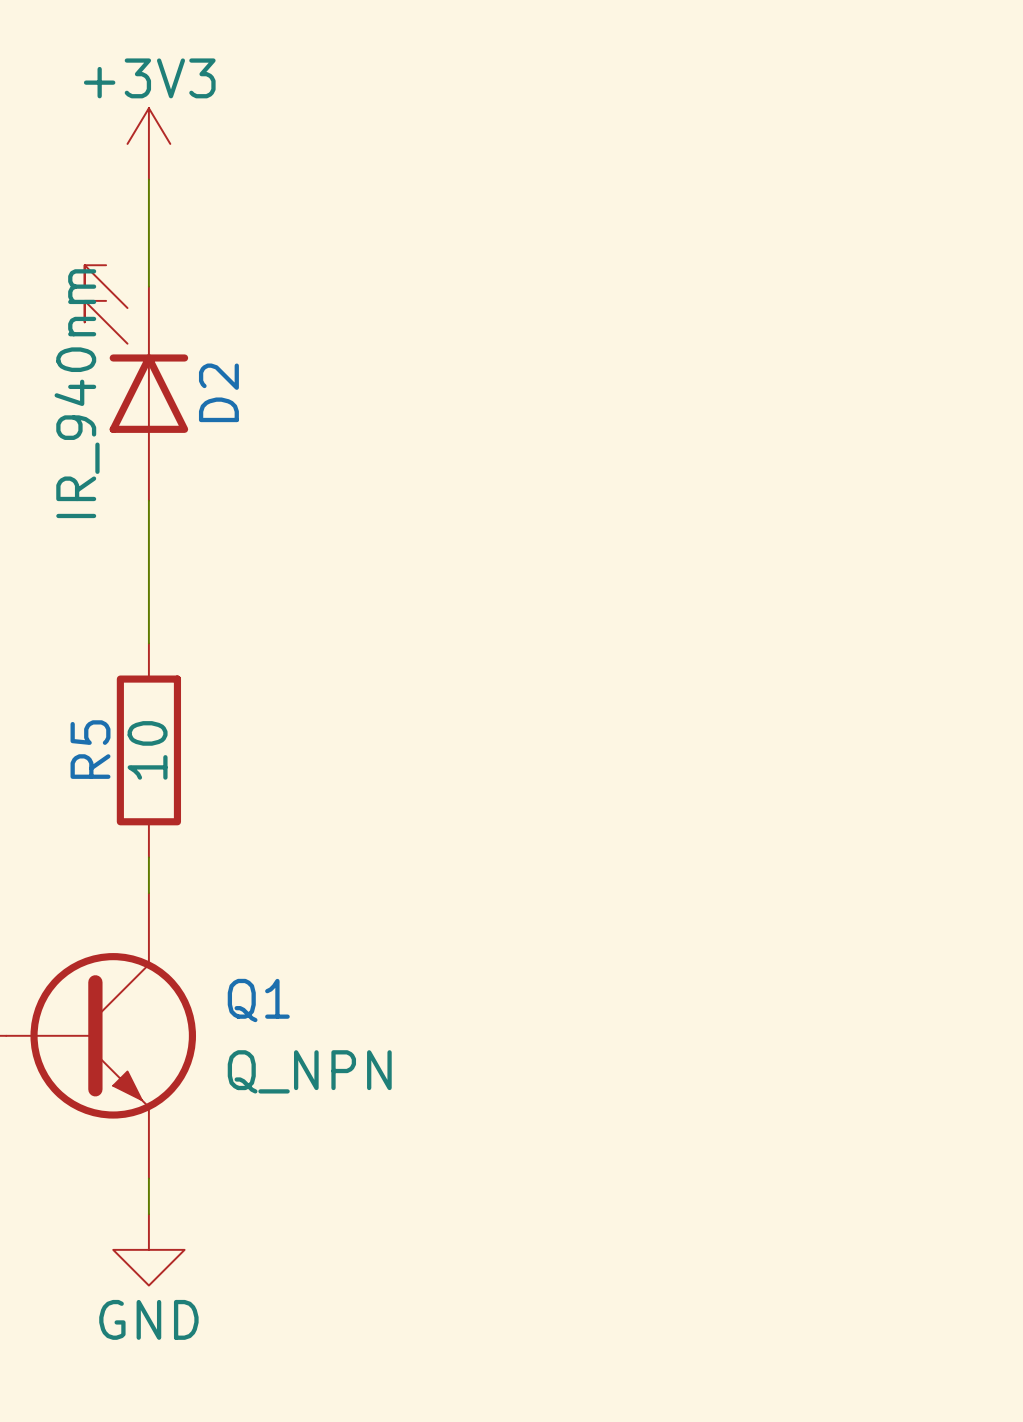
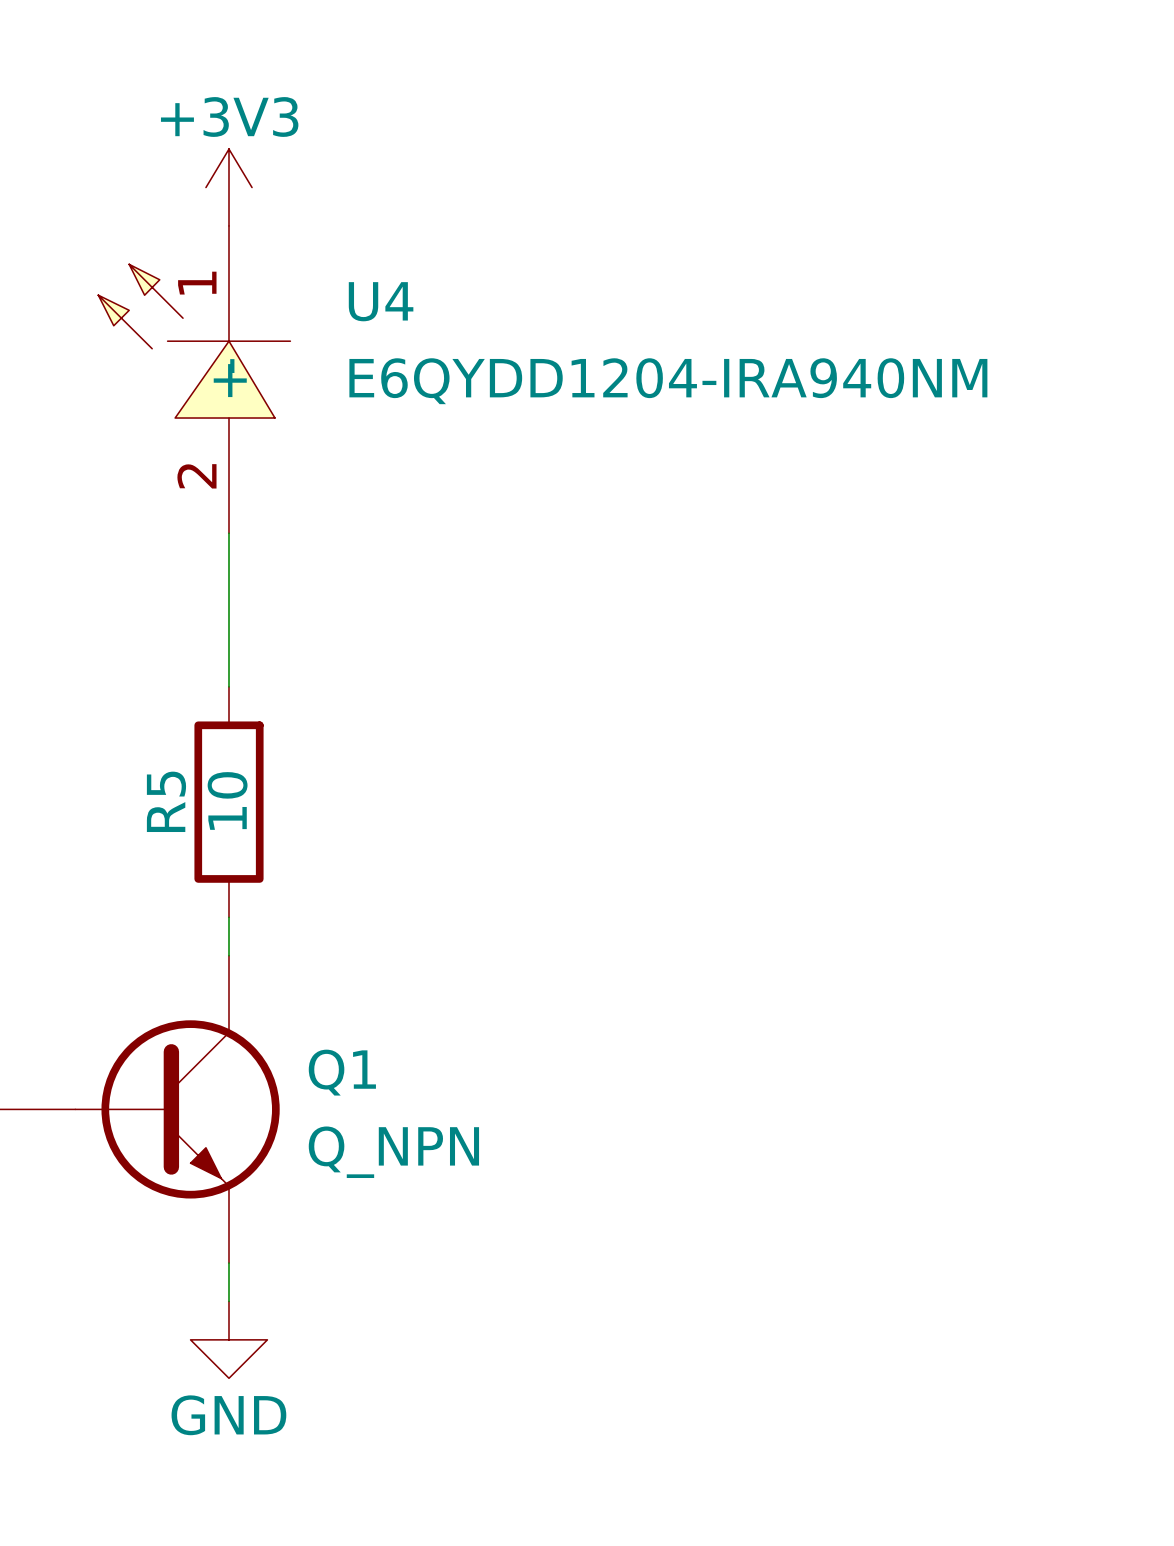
power symbol position: +3V3 (148, 143) -> +3V3 (229, 187)
U4: none -> E6QYDD1204-IRA940NM (194, 379)
D2: IR_940nm (136, 382) -> none

